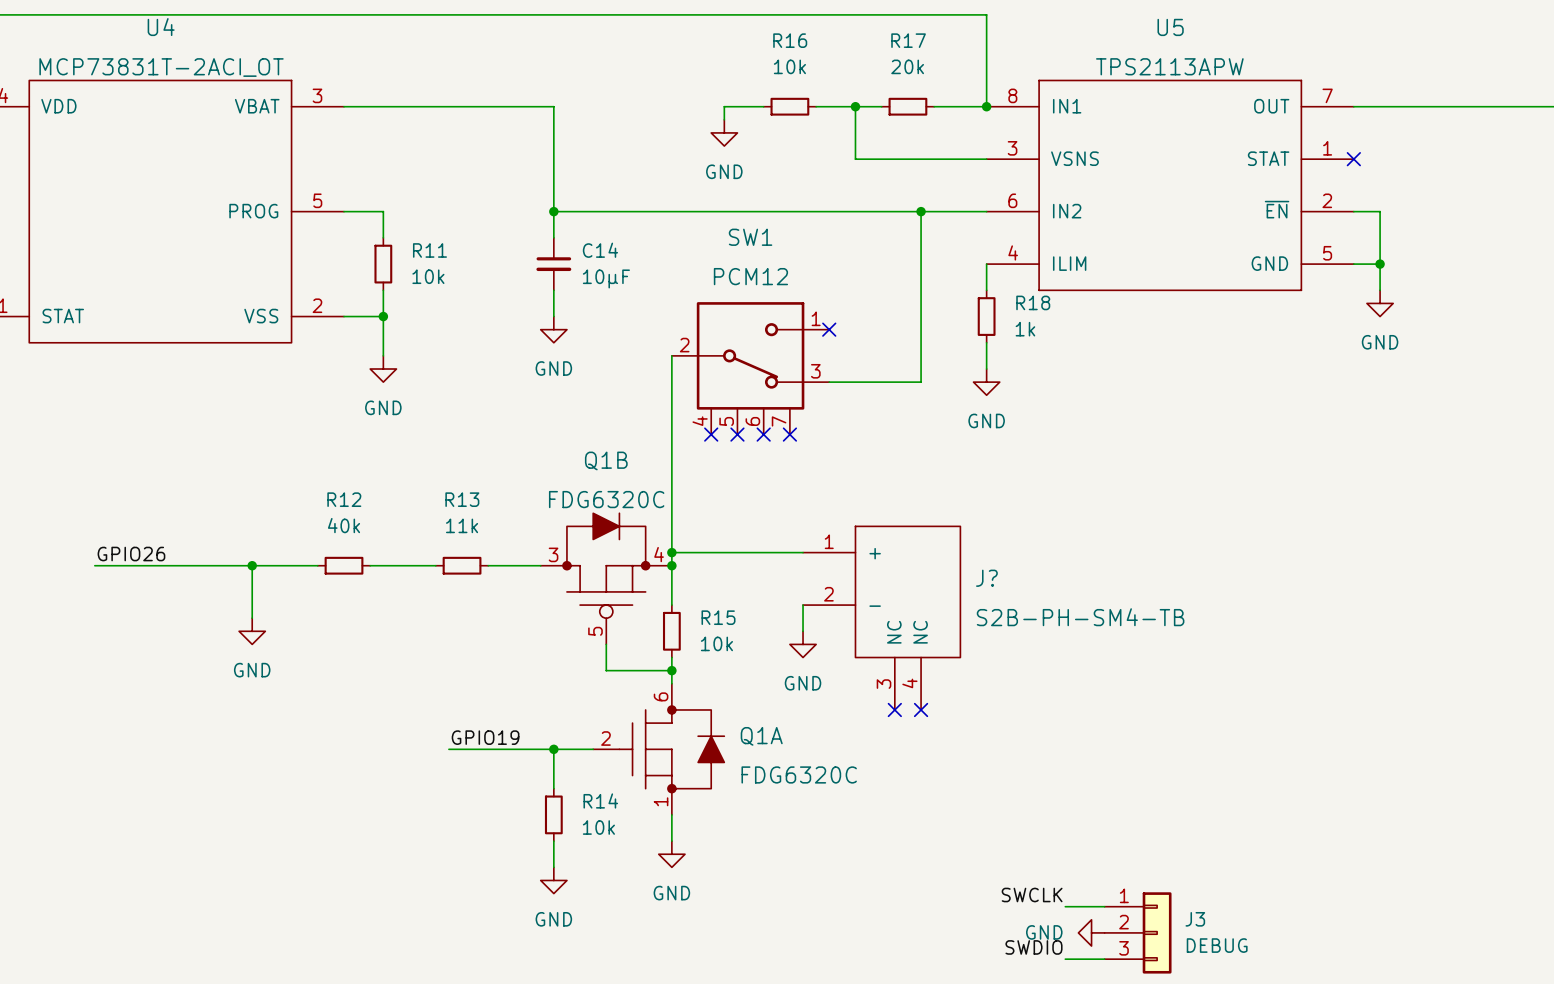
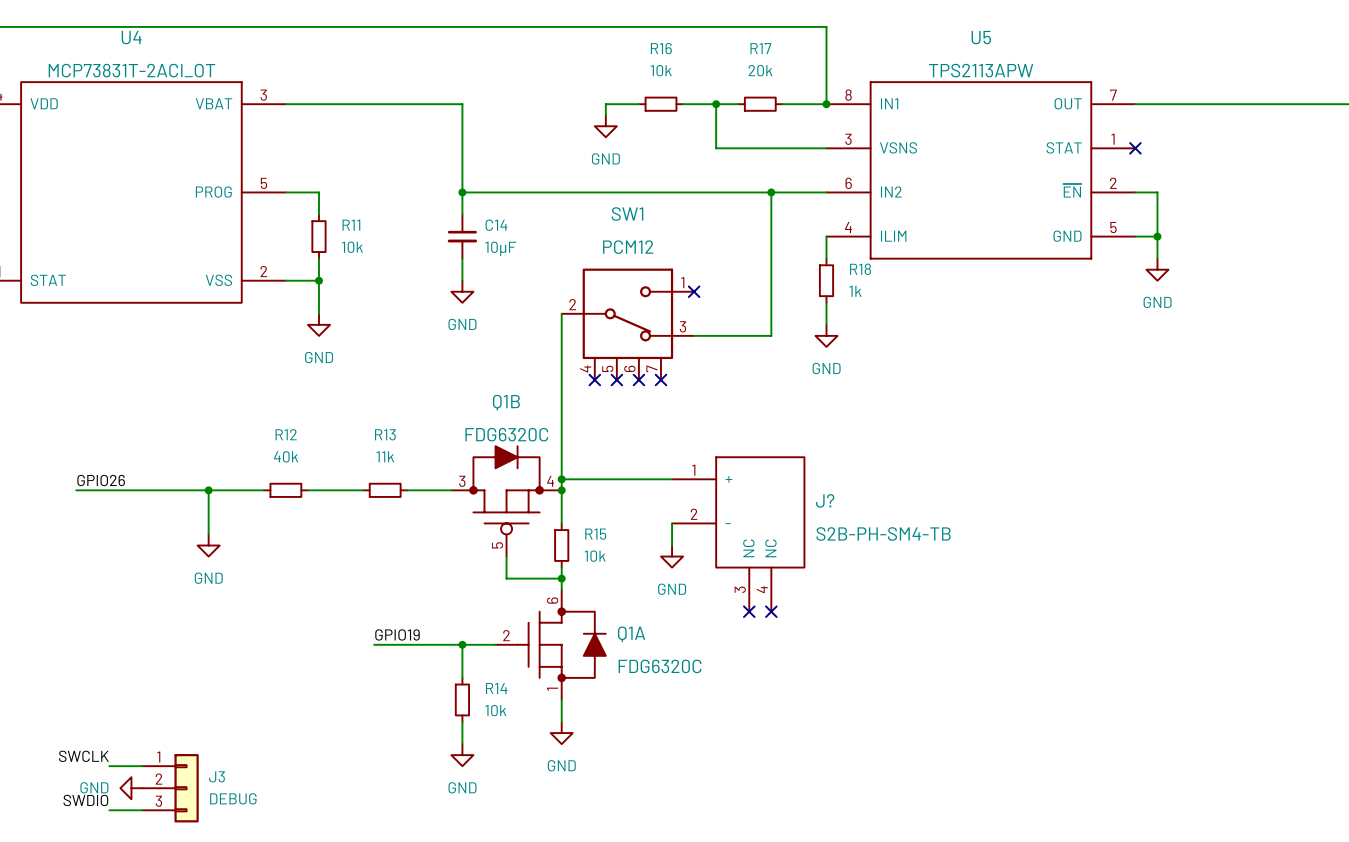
label: none -> SWCLK (83, 756)
wire: none -> (109, 766) (142, 766)
label: SWCLK (1032, 895) -> none
wire: (1065, 906) (1104, 906) -> none
power symbol: none -> GND (131, 788)
power symbol: GND (1091, 932) -> none
J3 position: (1138, 932) -> (170, 788)
label: none -> SWDIO (85, 800)
wire: none -> (109, 810) (142, 810)
label: SWDIO (1033, 947) -> none
wire: (1065, 959) (1104, 959) -> none

